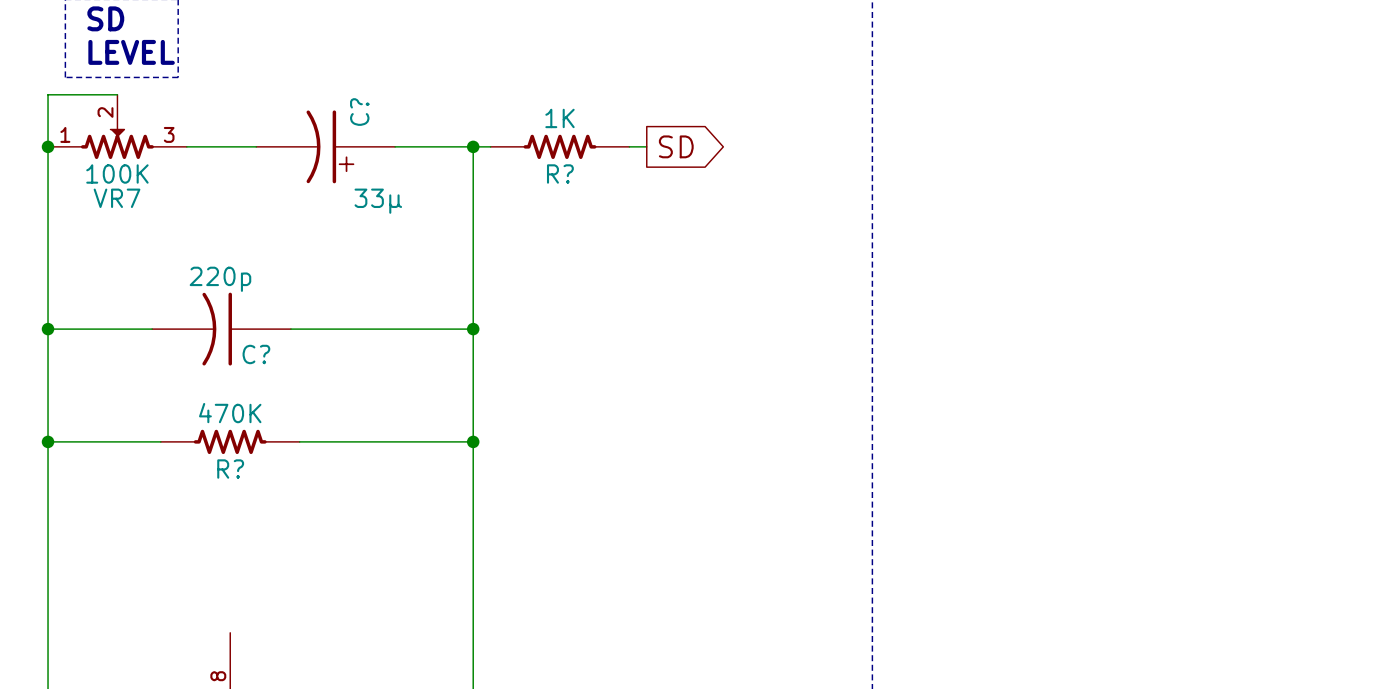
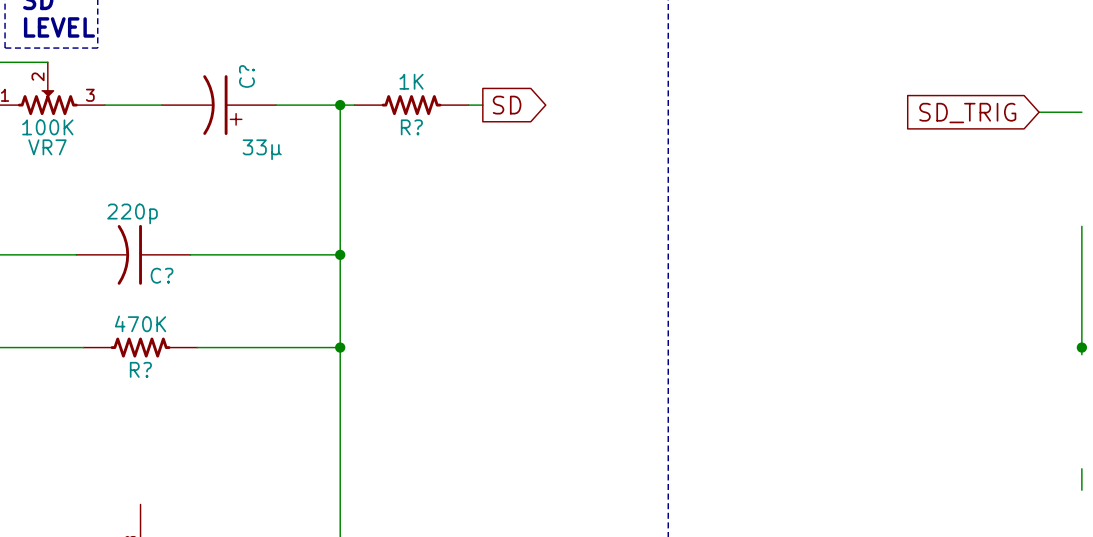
wire: none -> (1039, 112) (1081, 112)
global label: none -> SD_TRIG (967, 113)
wire: none -> (1081, 226) (1081, 354)
junction: none -> (1081, 347)
wire: none -> (1081, 468) (1081, 490)

